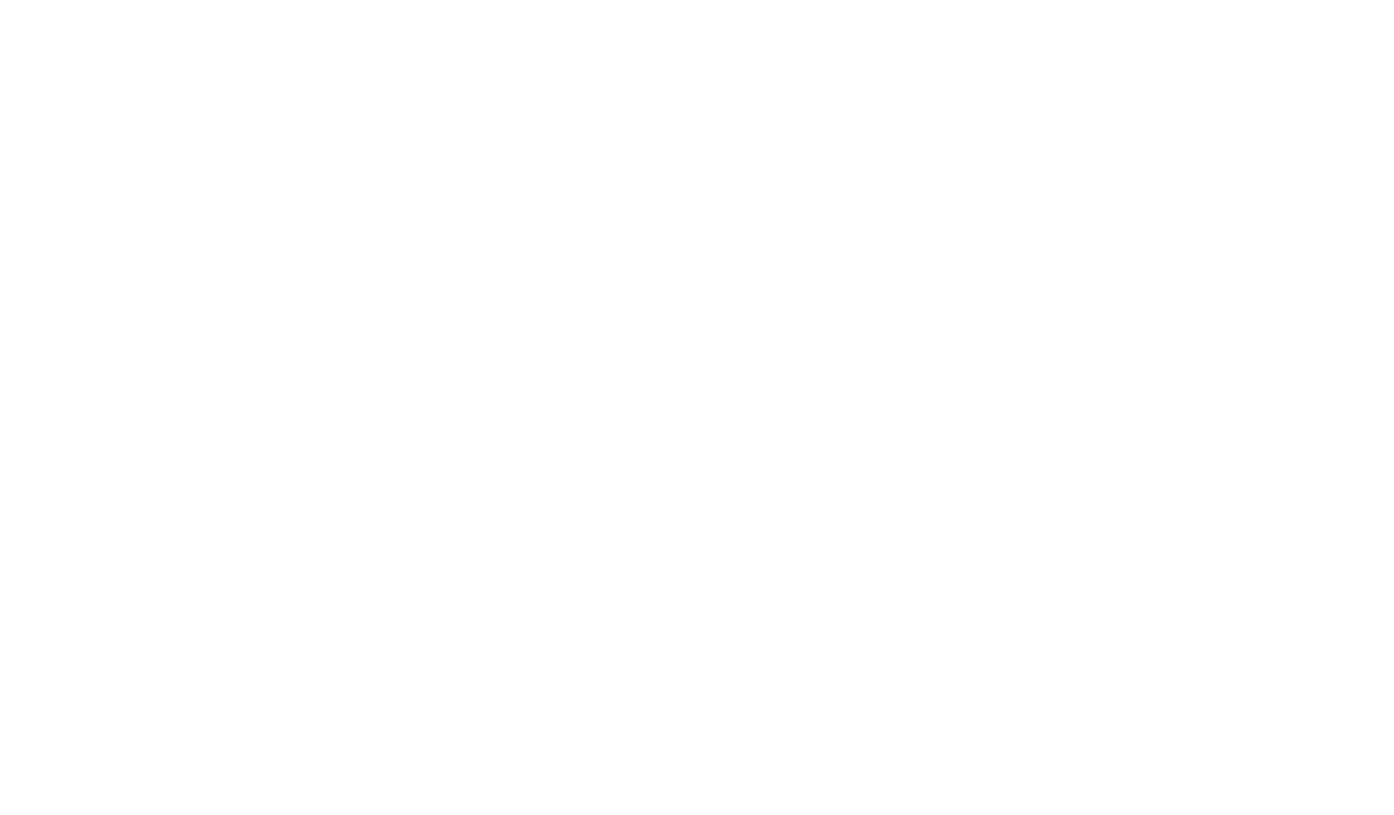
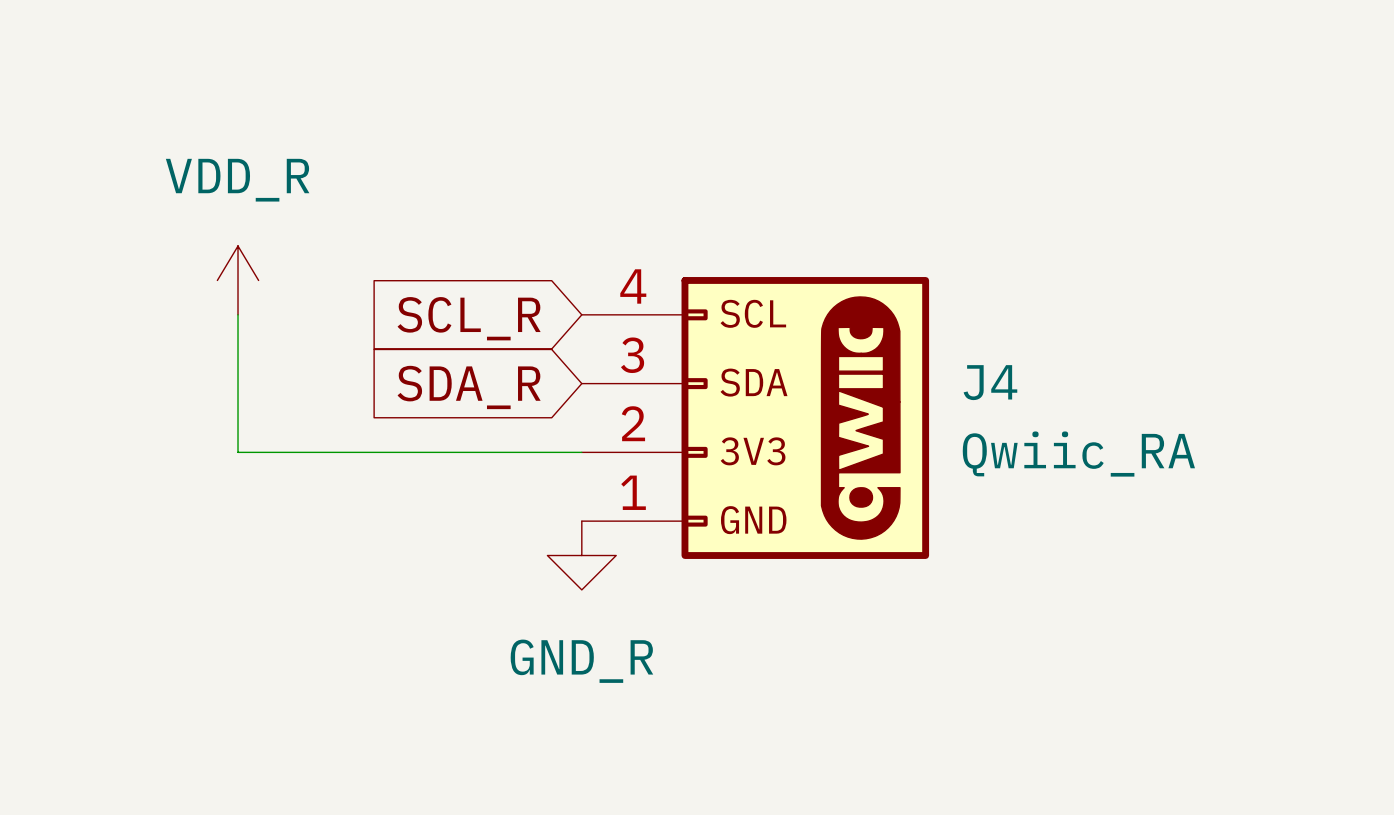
power symbol: none -> VDD_R (238, 280)
wire: none -> (238, 314) (238, 452) (581, 452)
global label: none -> SCL_R (469, 318)
global label: none -> SDA_R (469, 387)
J4: none -> Qwiic_RA (755, 417)
power symbol: none -> GND_R (581, 555)

